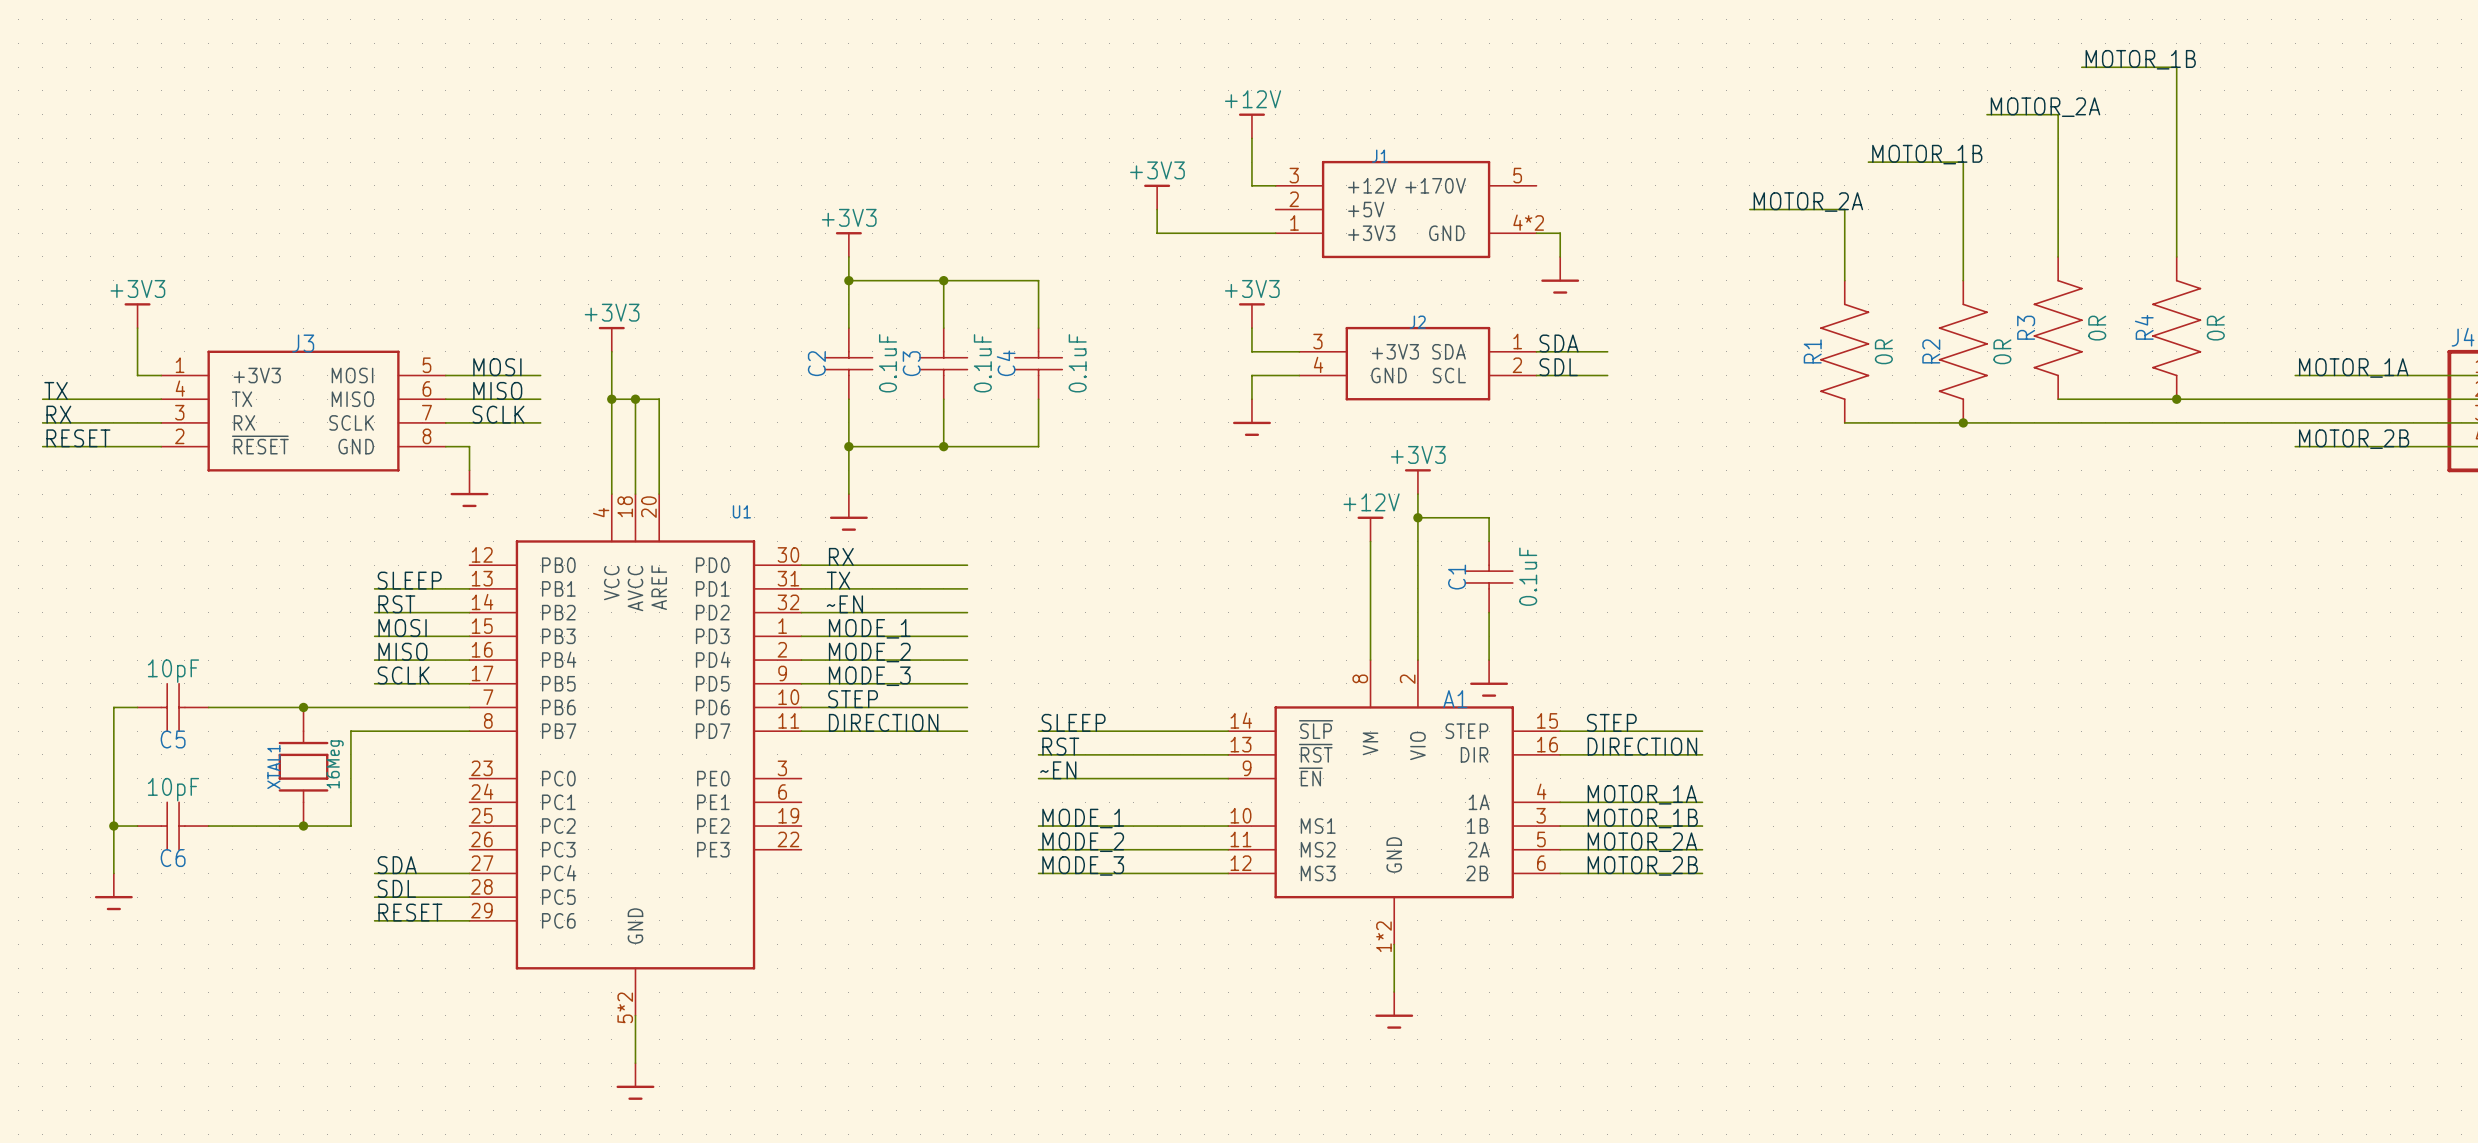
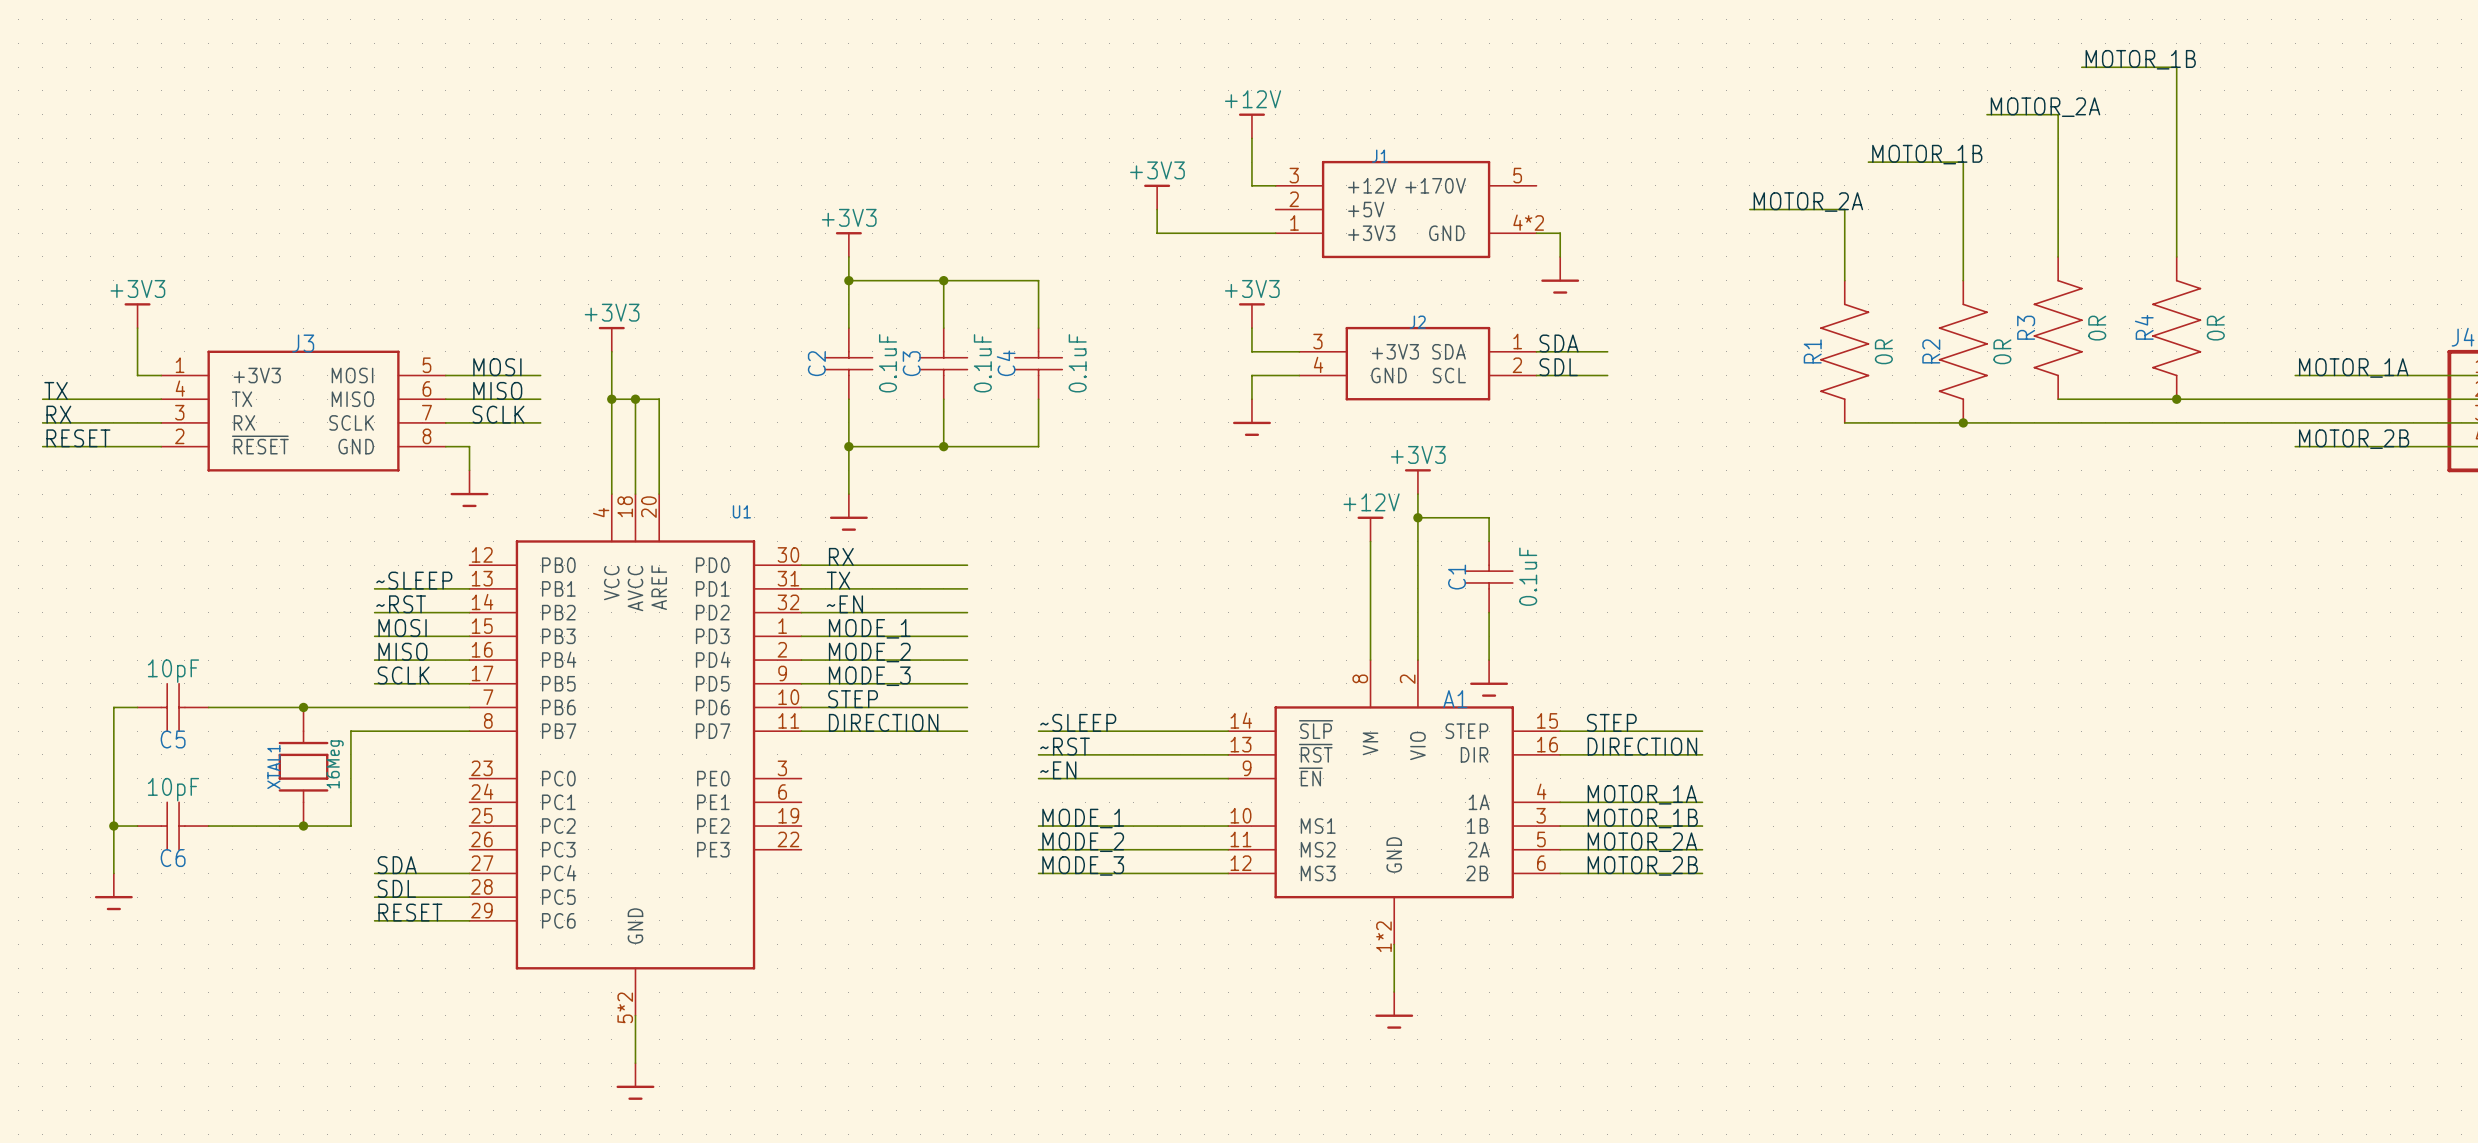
label: SLEEP (409, 580) -> ~SLEEP (414, 580)
label: RST (396, 604) -> ~RST (401, 604)
label: SLEEP (1073, 722) -> ~SLEEP (1078, 722)
label: RST (1060, 746) -> ~RST (1065, 746)

